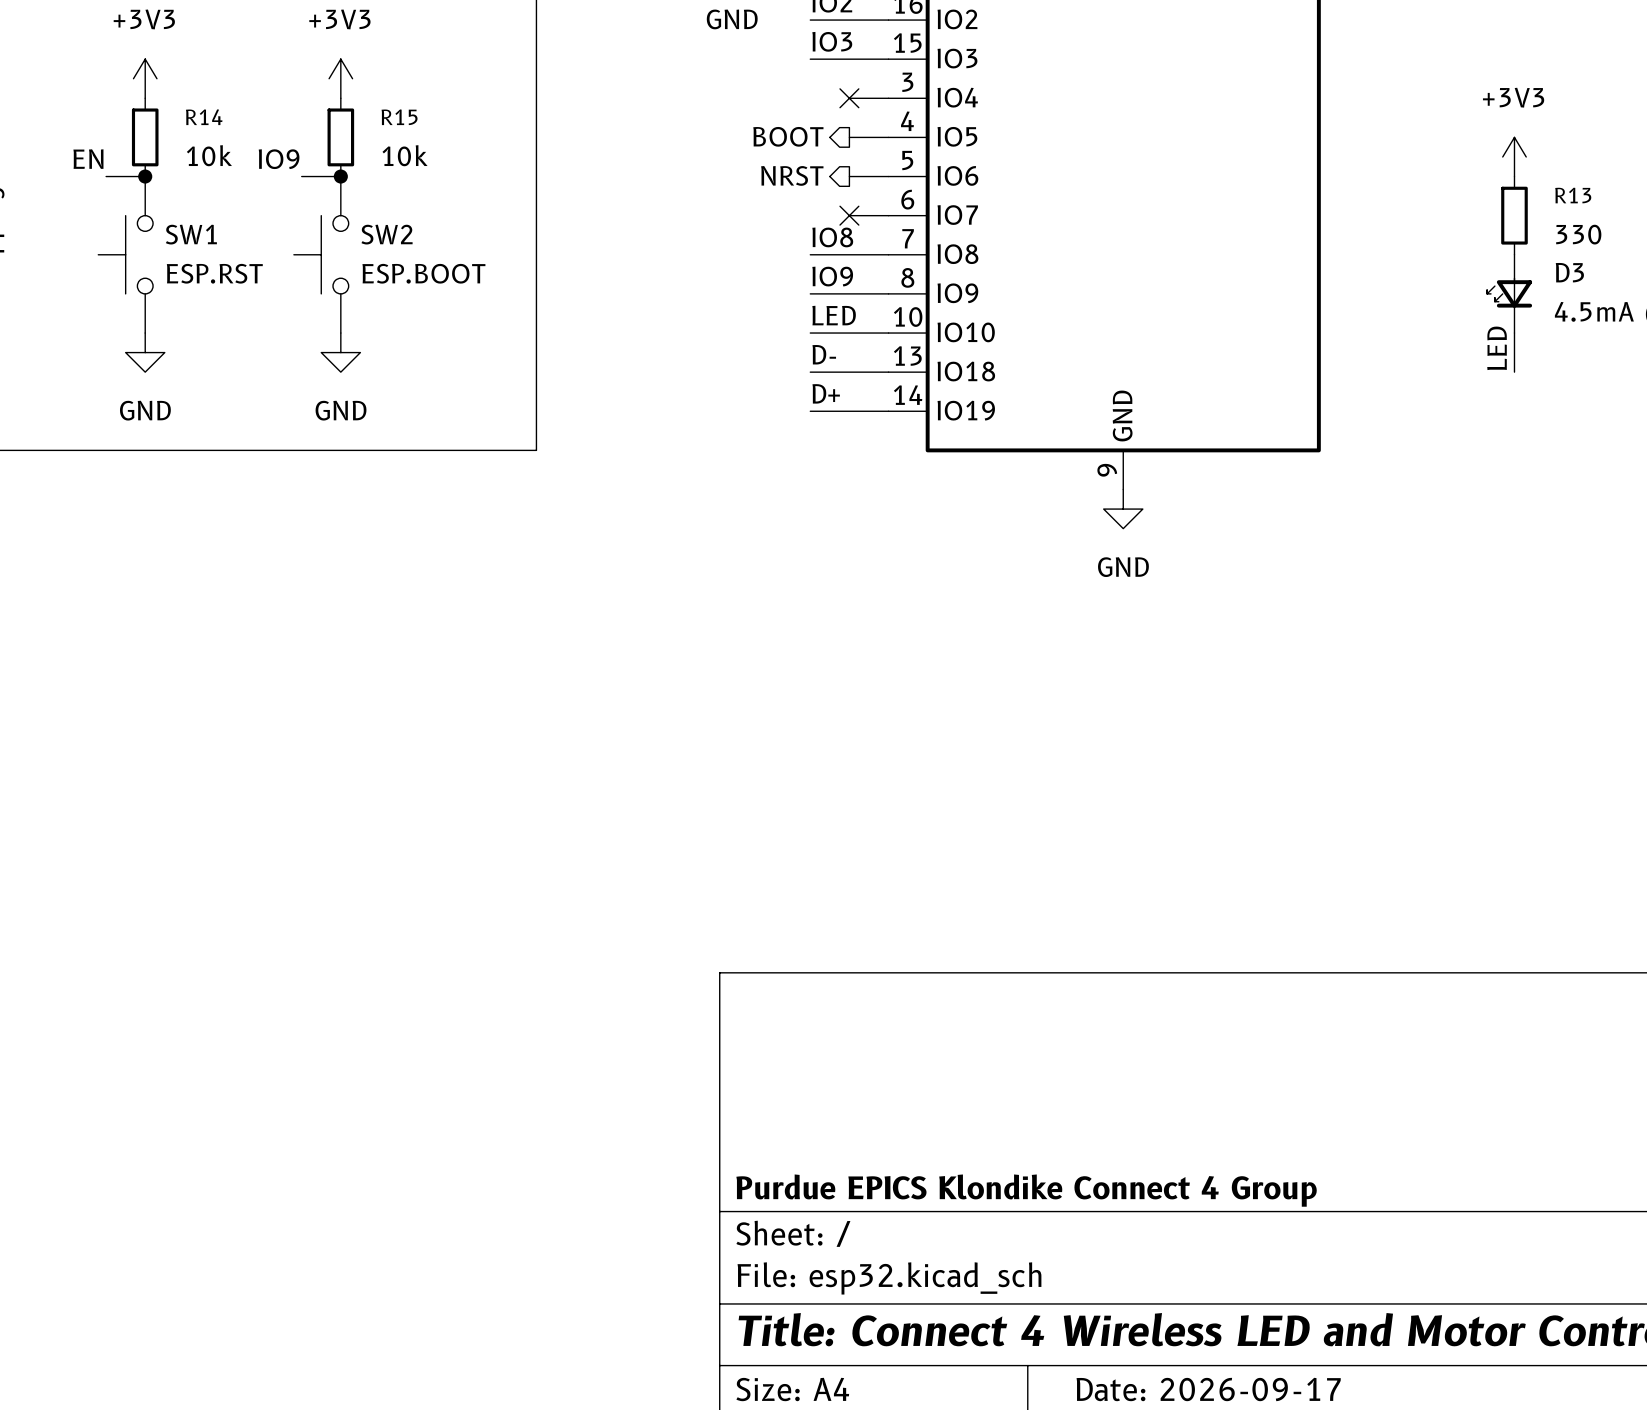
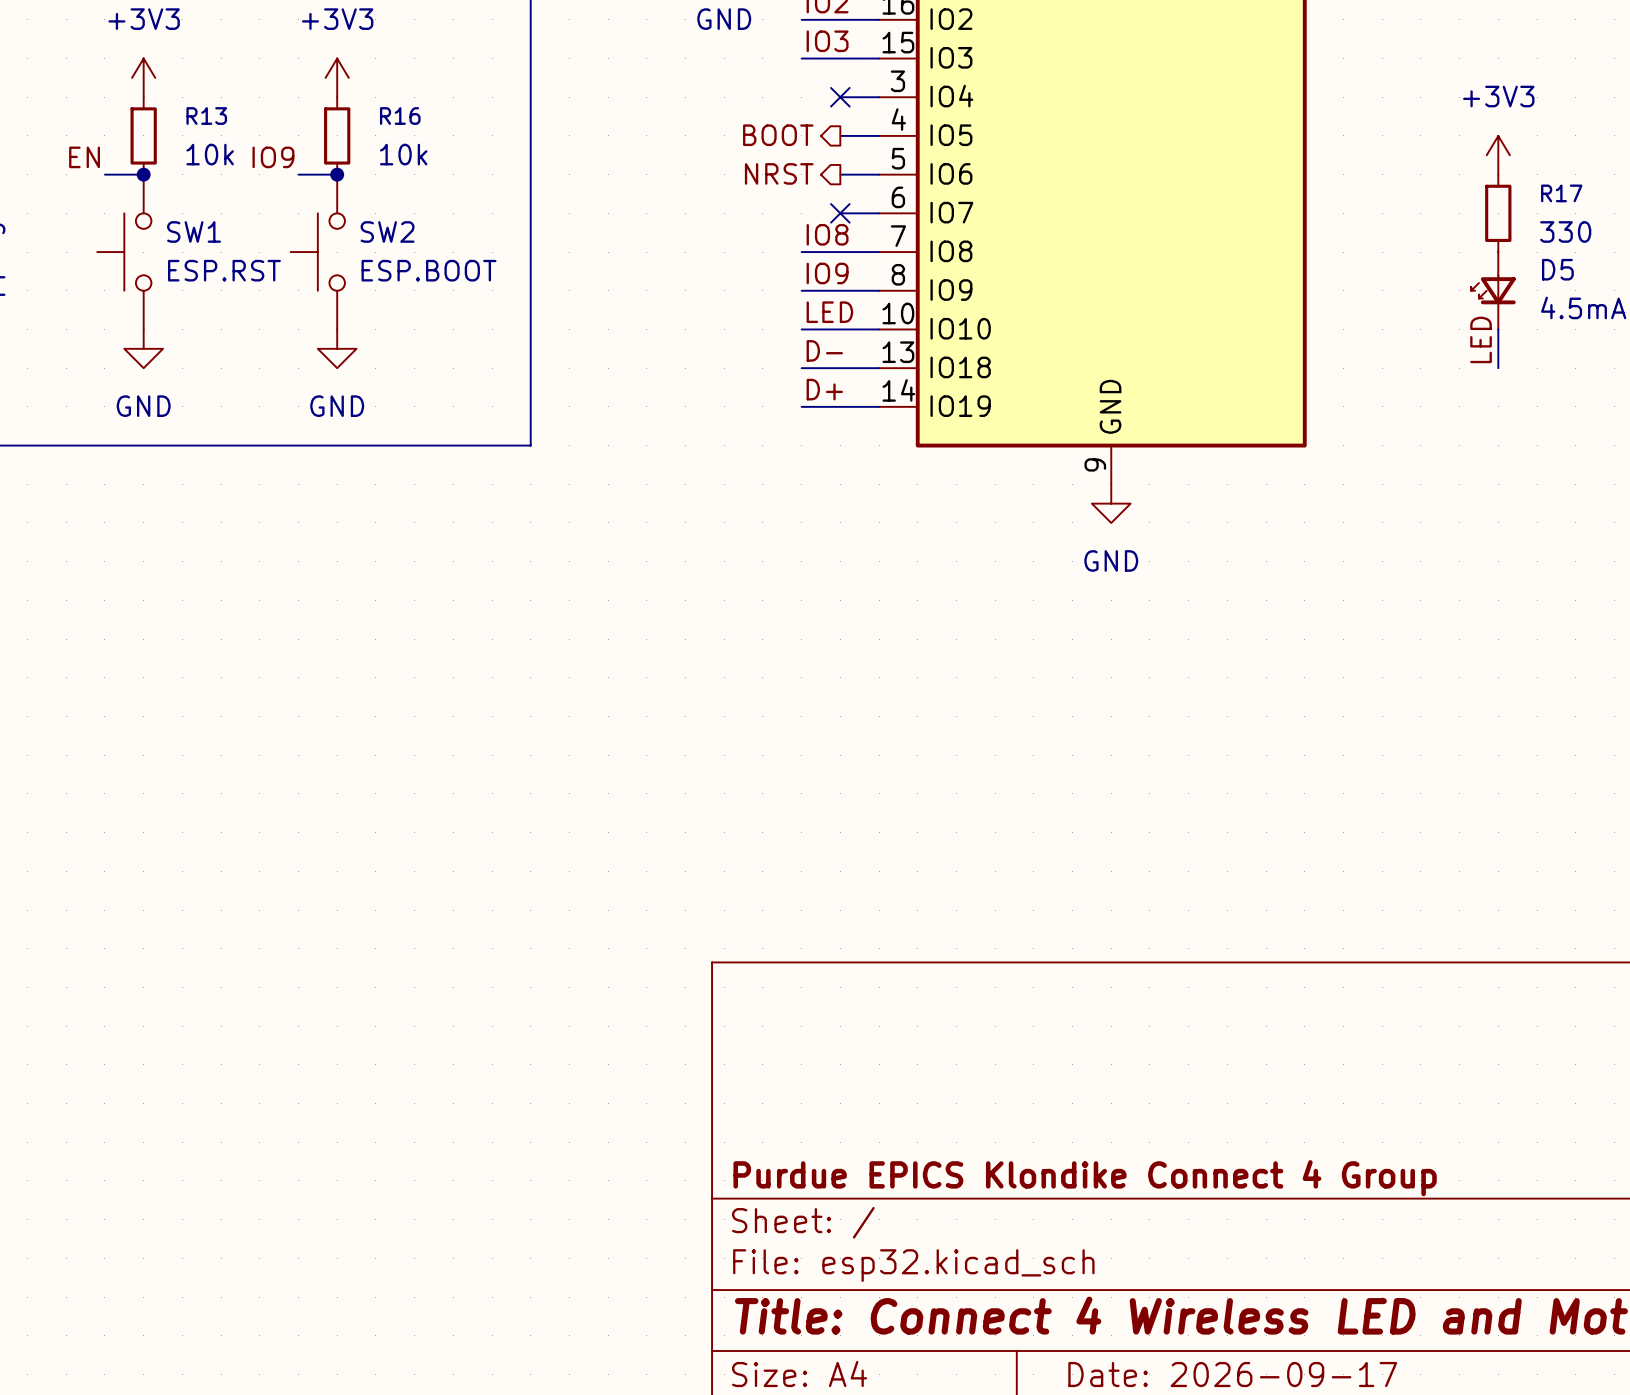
R14 name: R14 (204, 117) -> R13 (206, 116)
R15 name: R15 (399, 117) -> R16 (400, 116)
R13 name: R13 (1573, 195) -> R17 (1561, 193)
D3 name: D3 (1569, 272) -> D5 (1557, 269)

